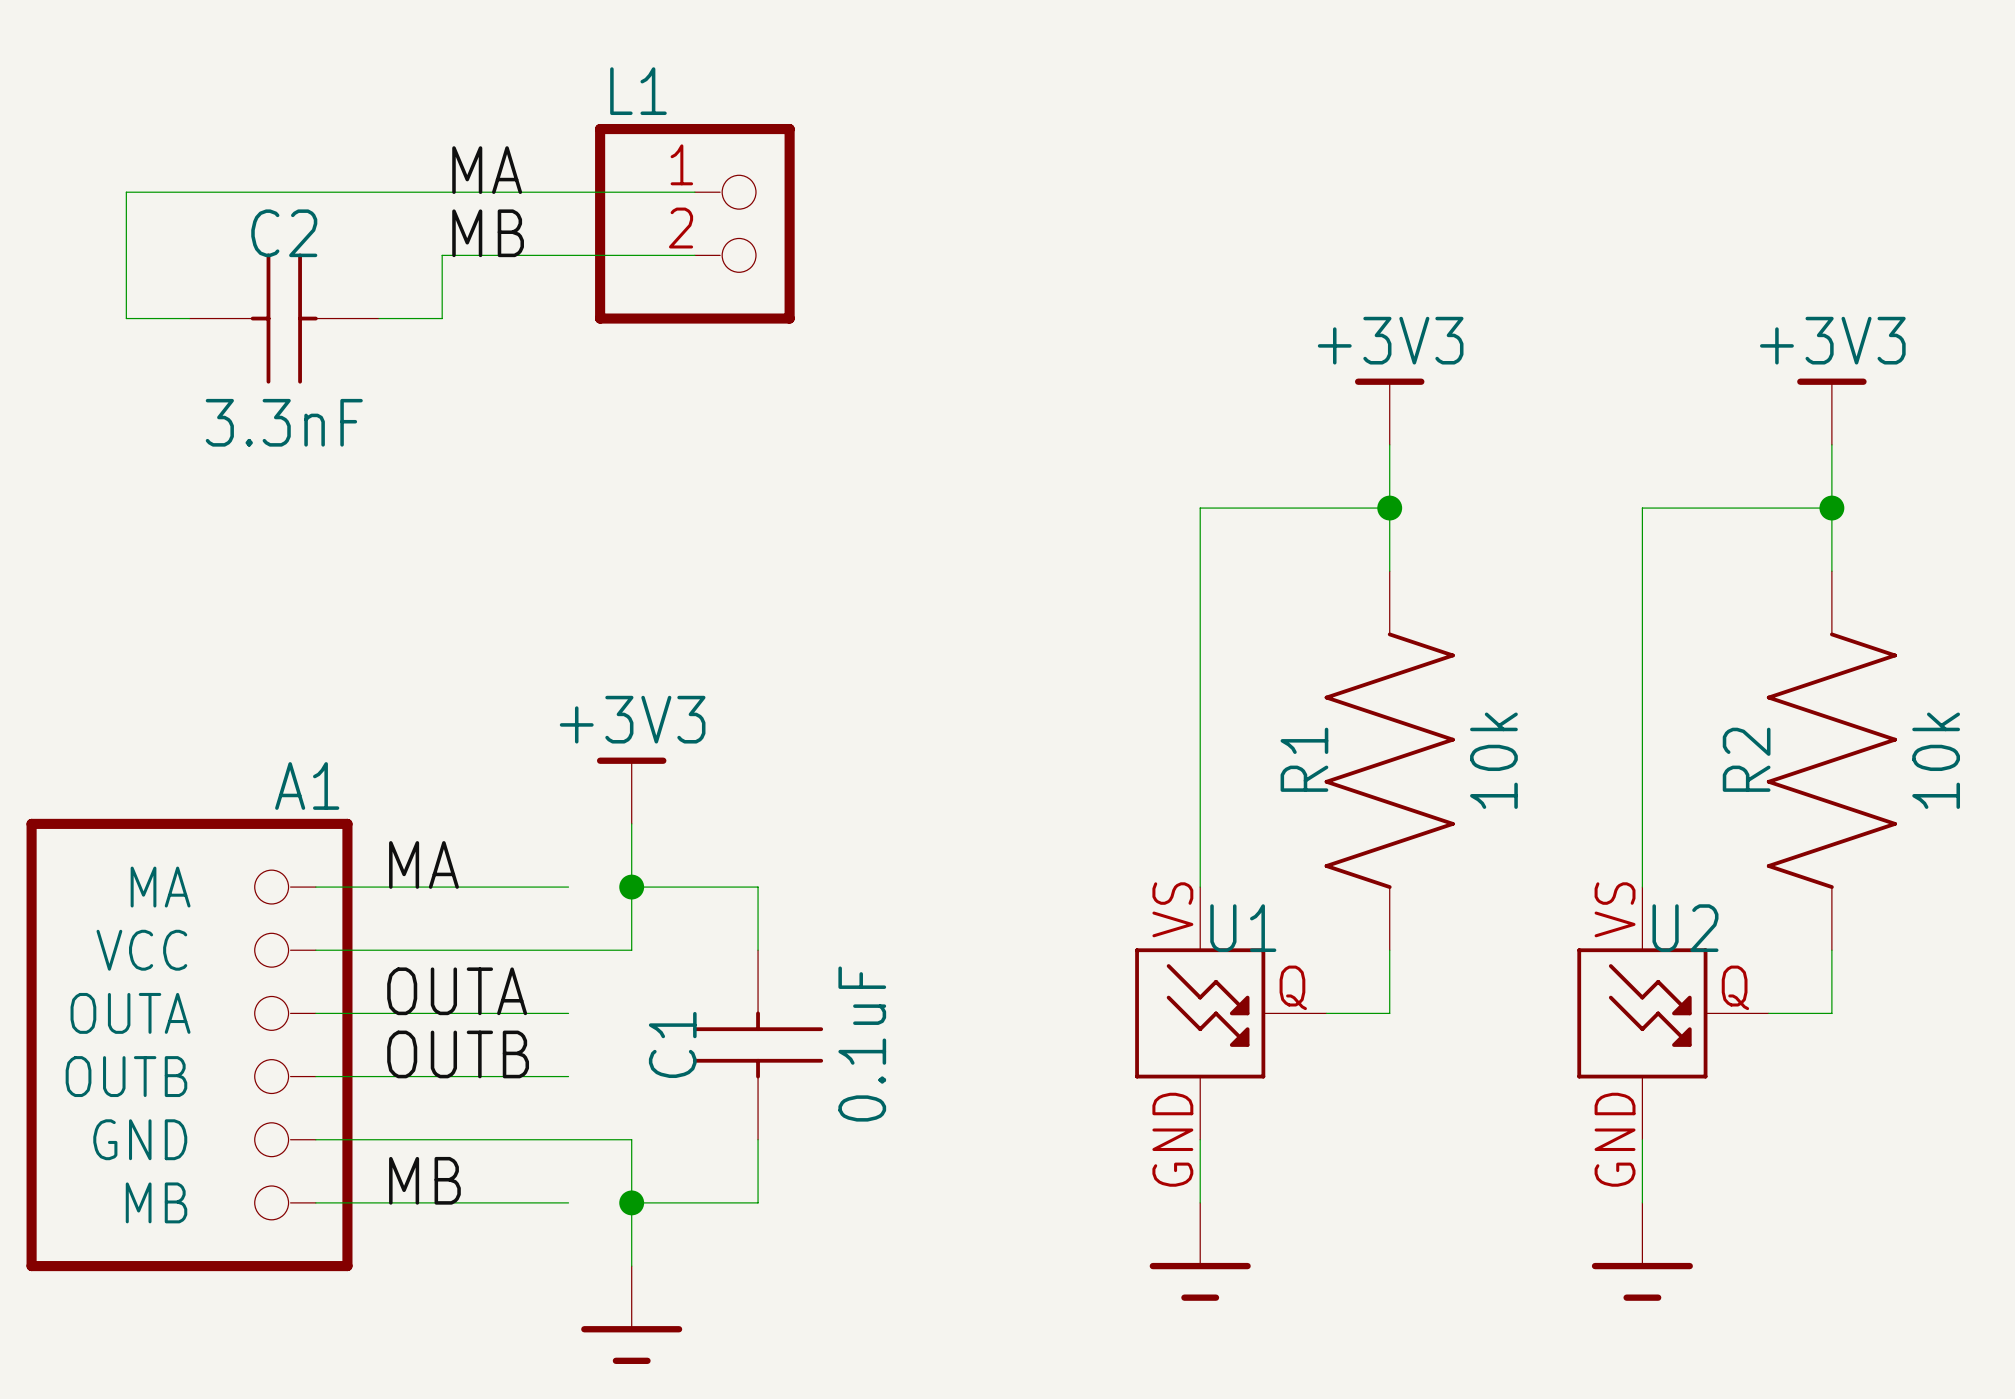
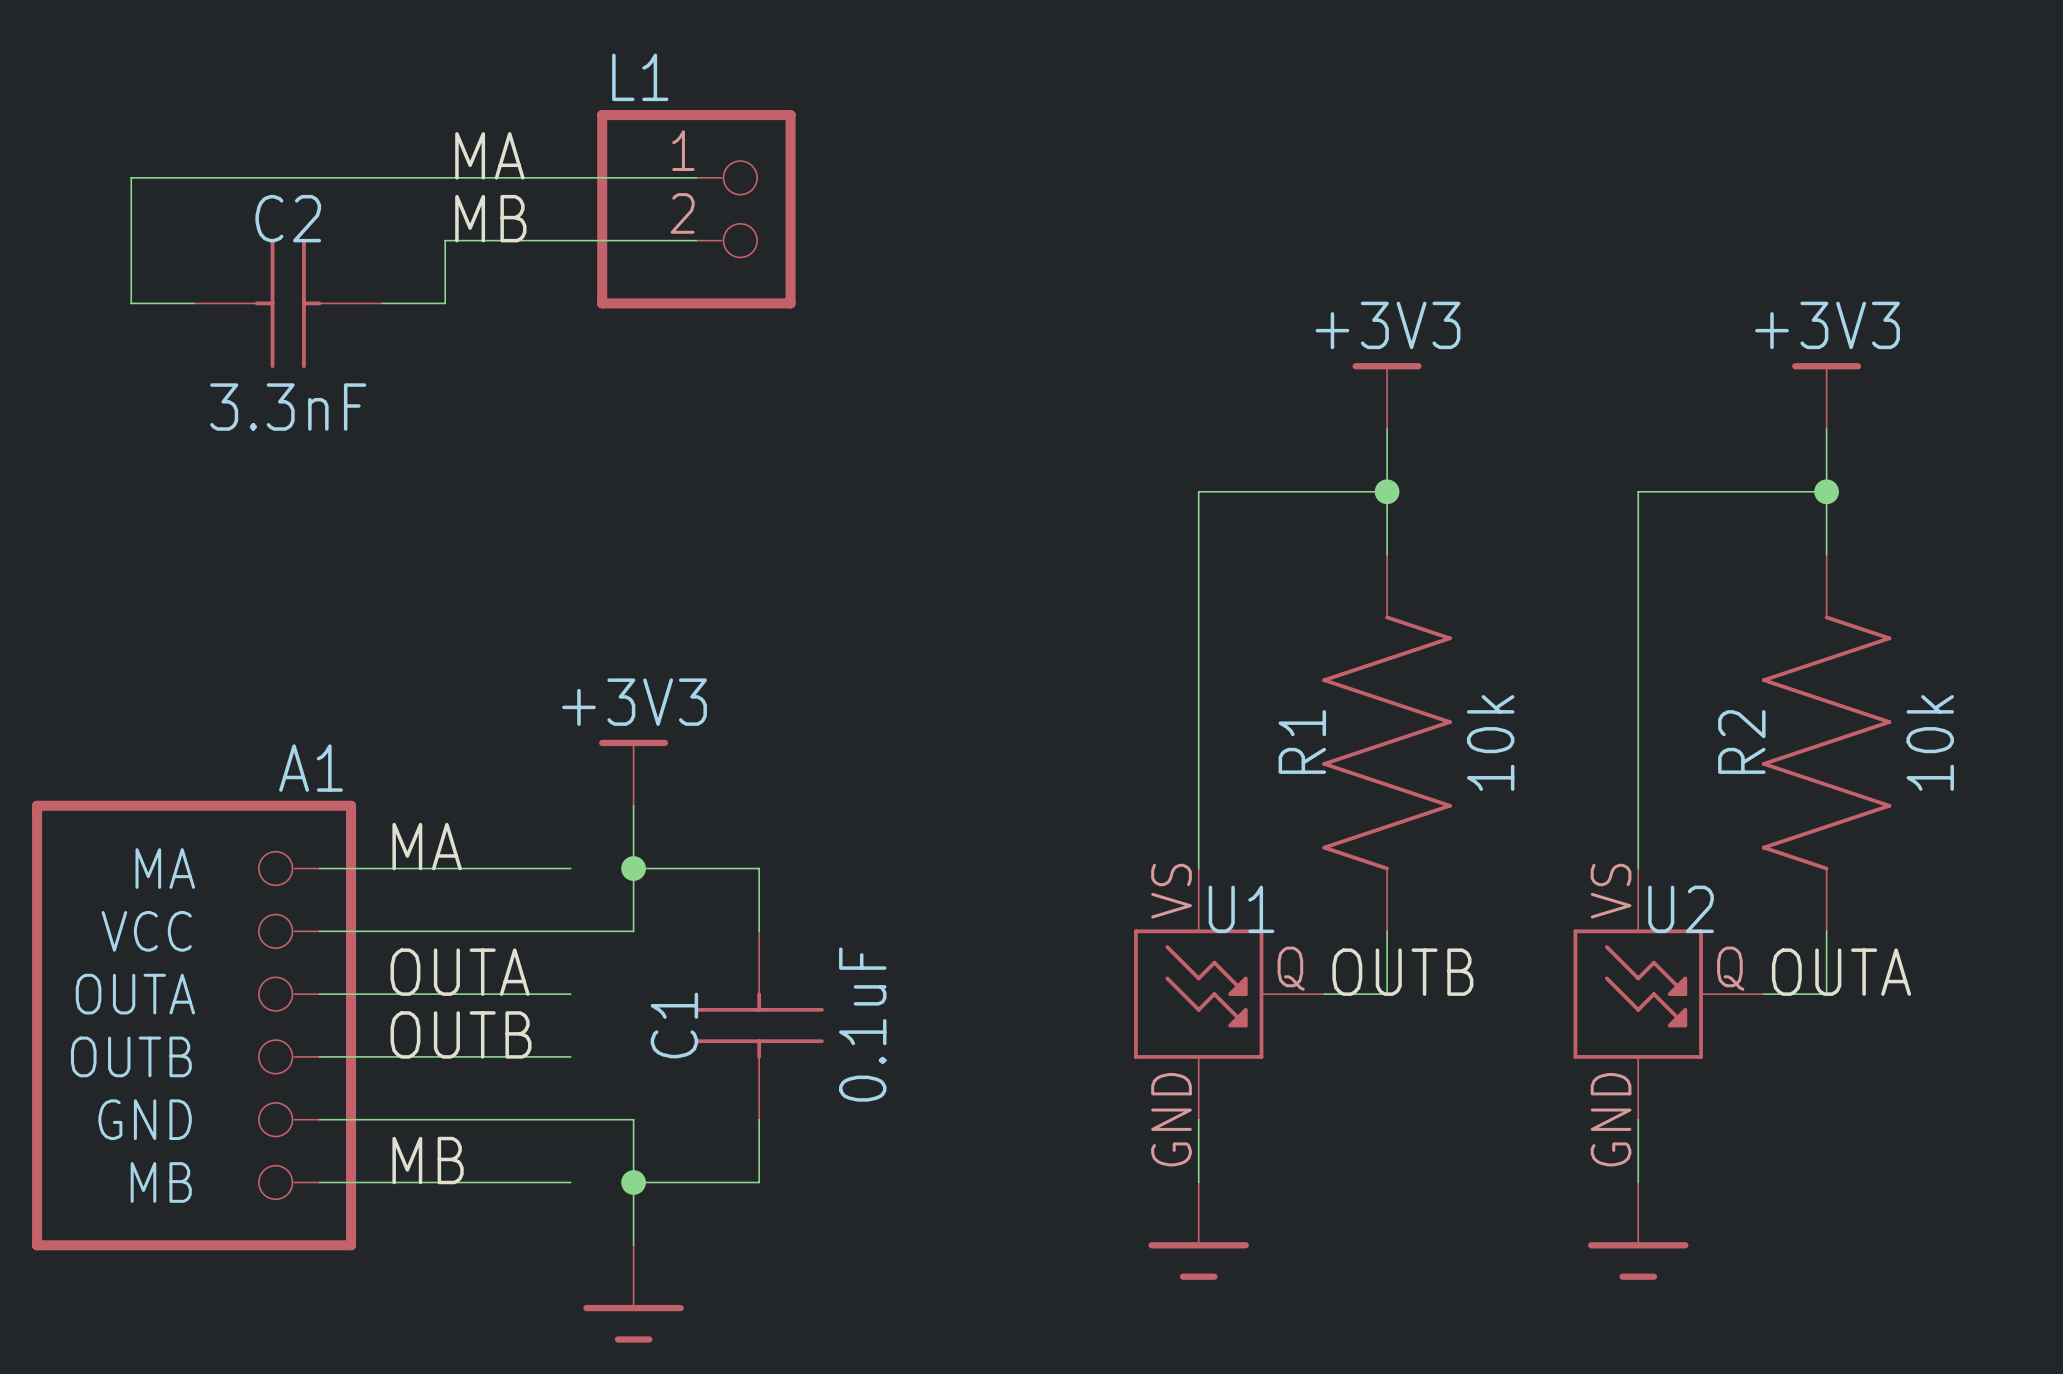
label: none -> OUTB (1402, 972)
label: none -> OUTA (1841, 972)

